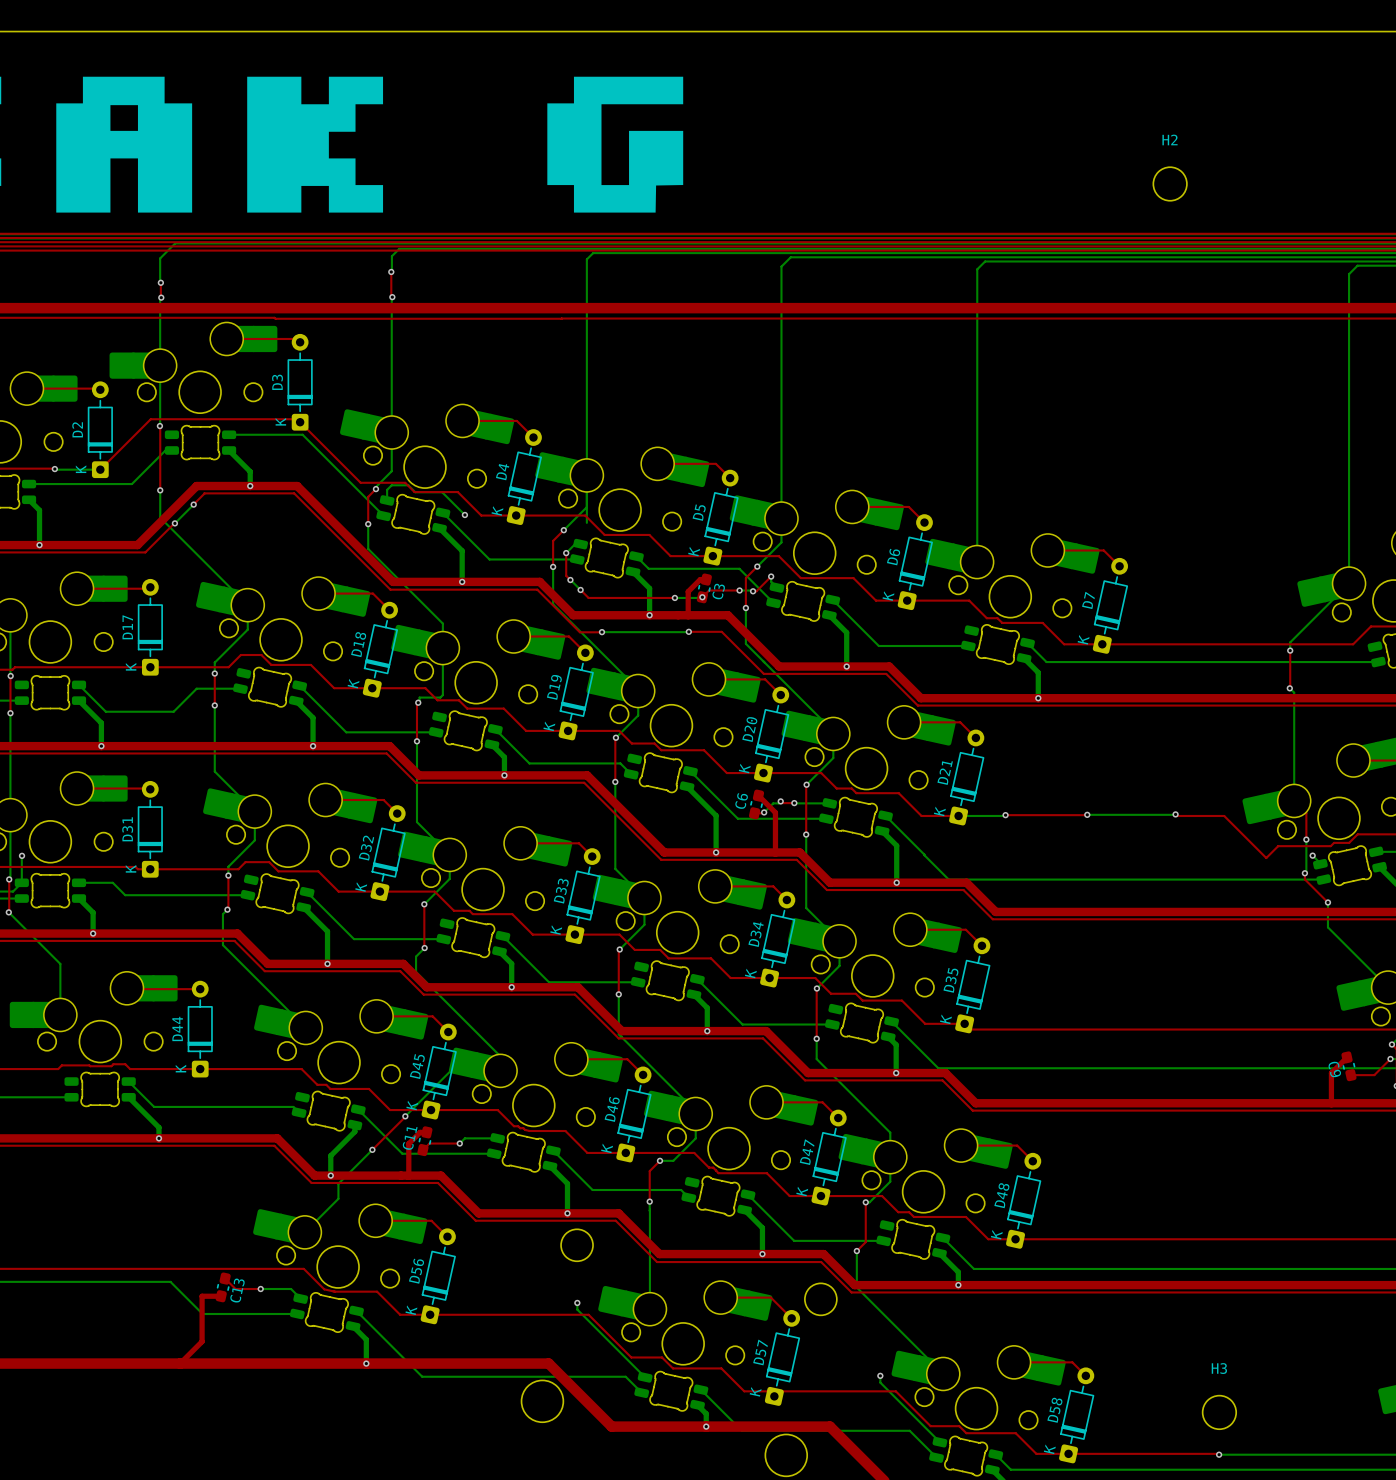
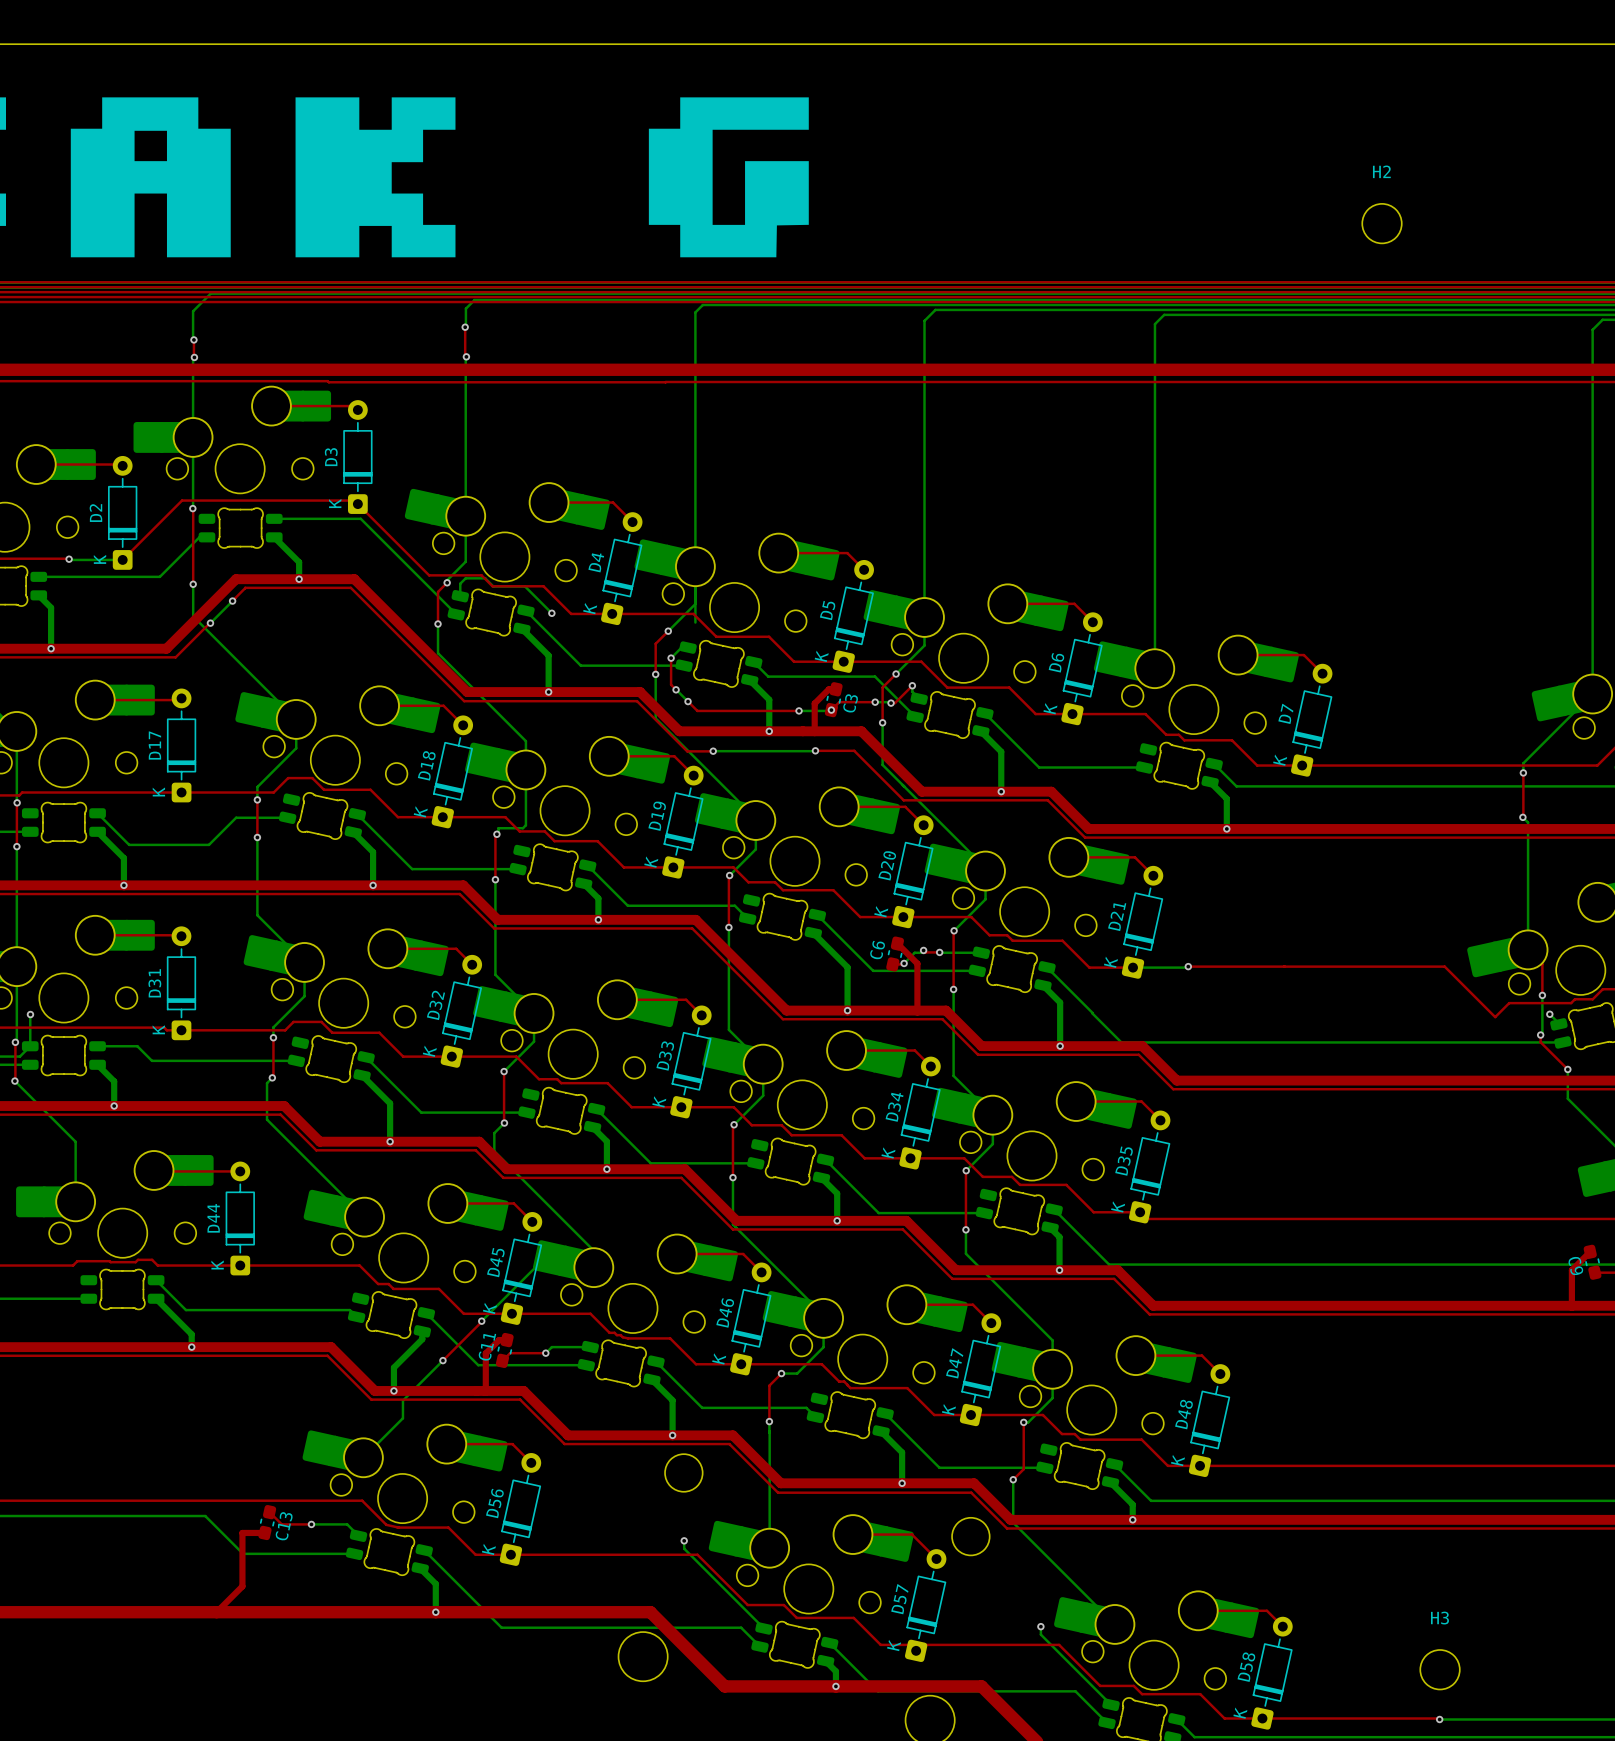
via: (1087, 814) -> none
top track: (1175, 814) (1177, 815) (1224, 815) -> (1284, 966) (1445, 967)
bottom track: (1175, 814) (1087, 814) -> none
via: (1175, 814) -> none

